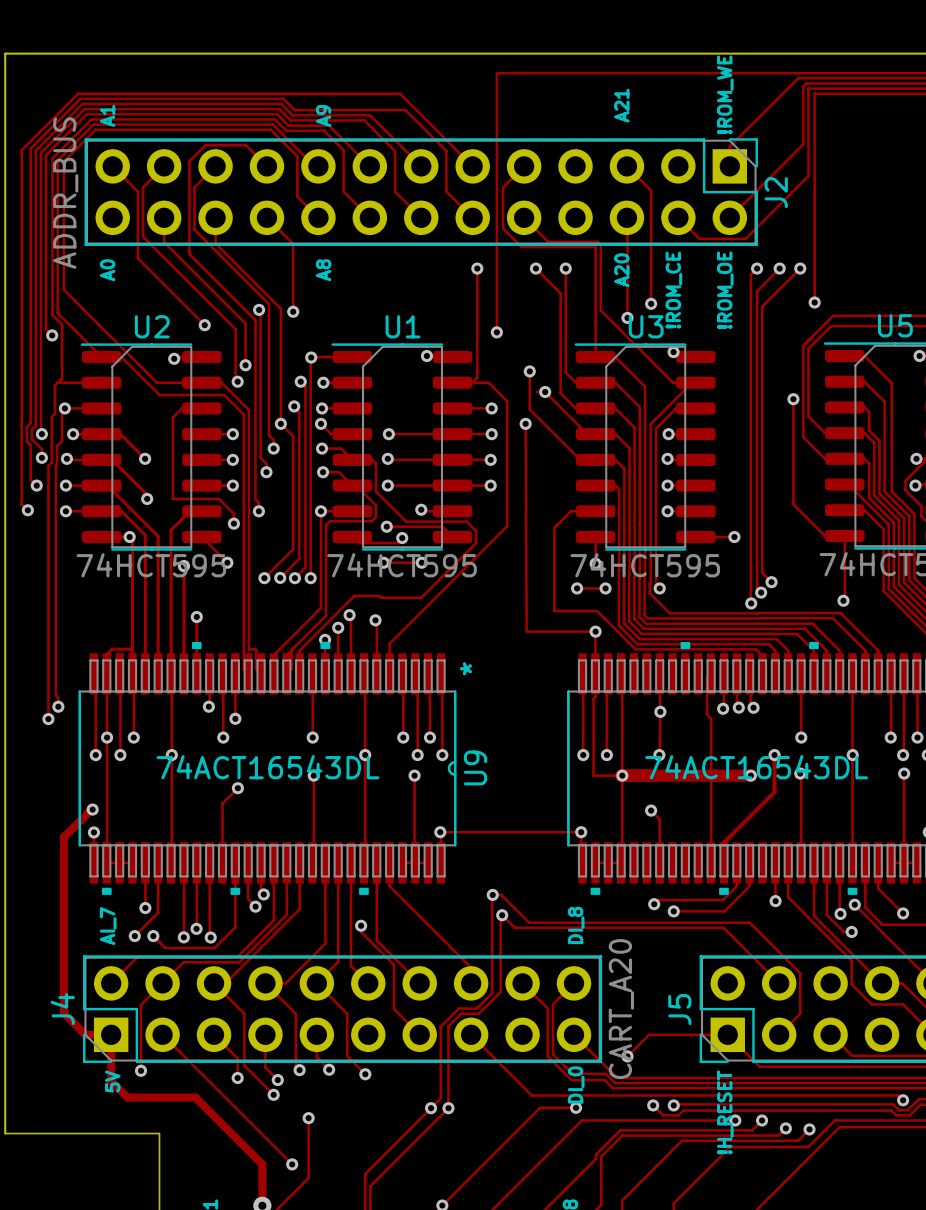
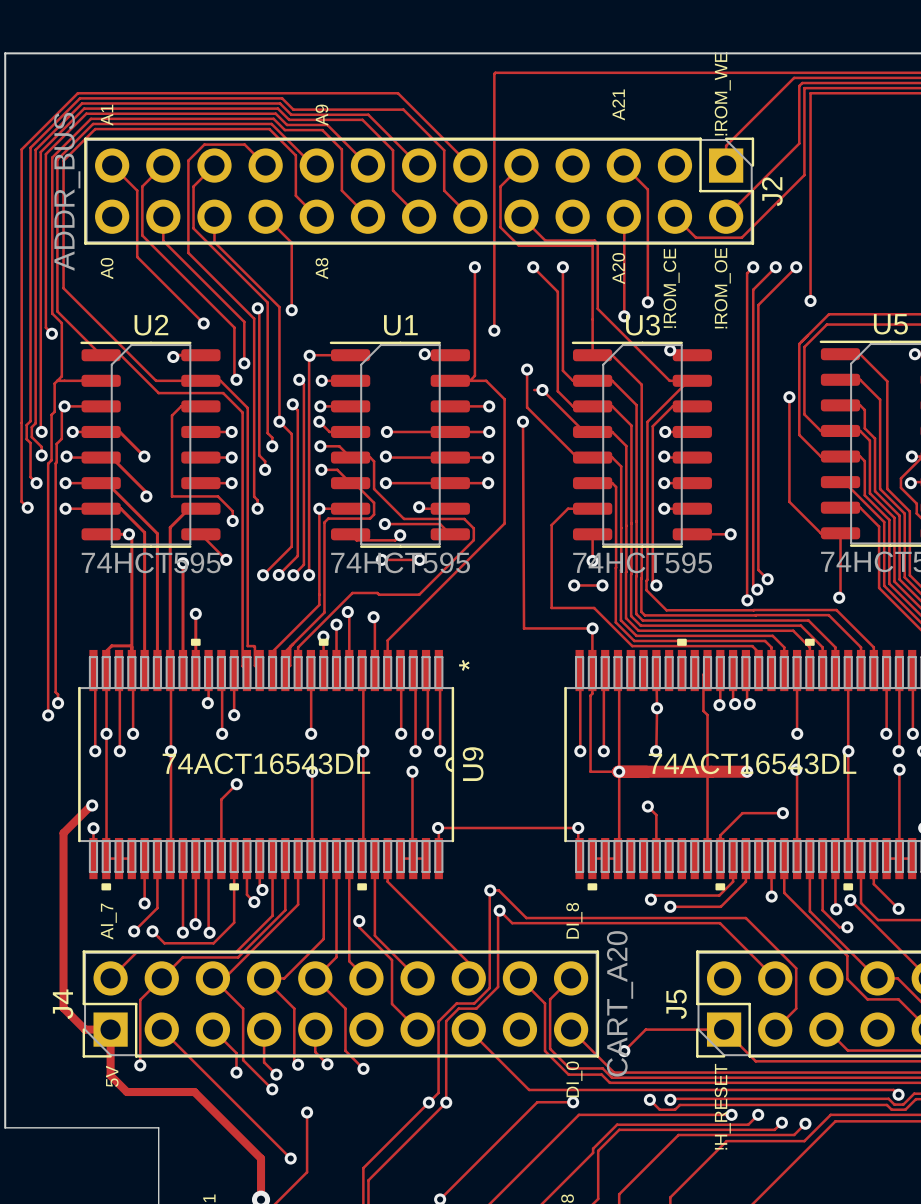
track: (774, 755) (774, 792) (723, 842) -> (782, 813) (742, 813) (720, 835) (720, 838)
via position: (774, 755) -> (782, 813)

